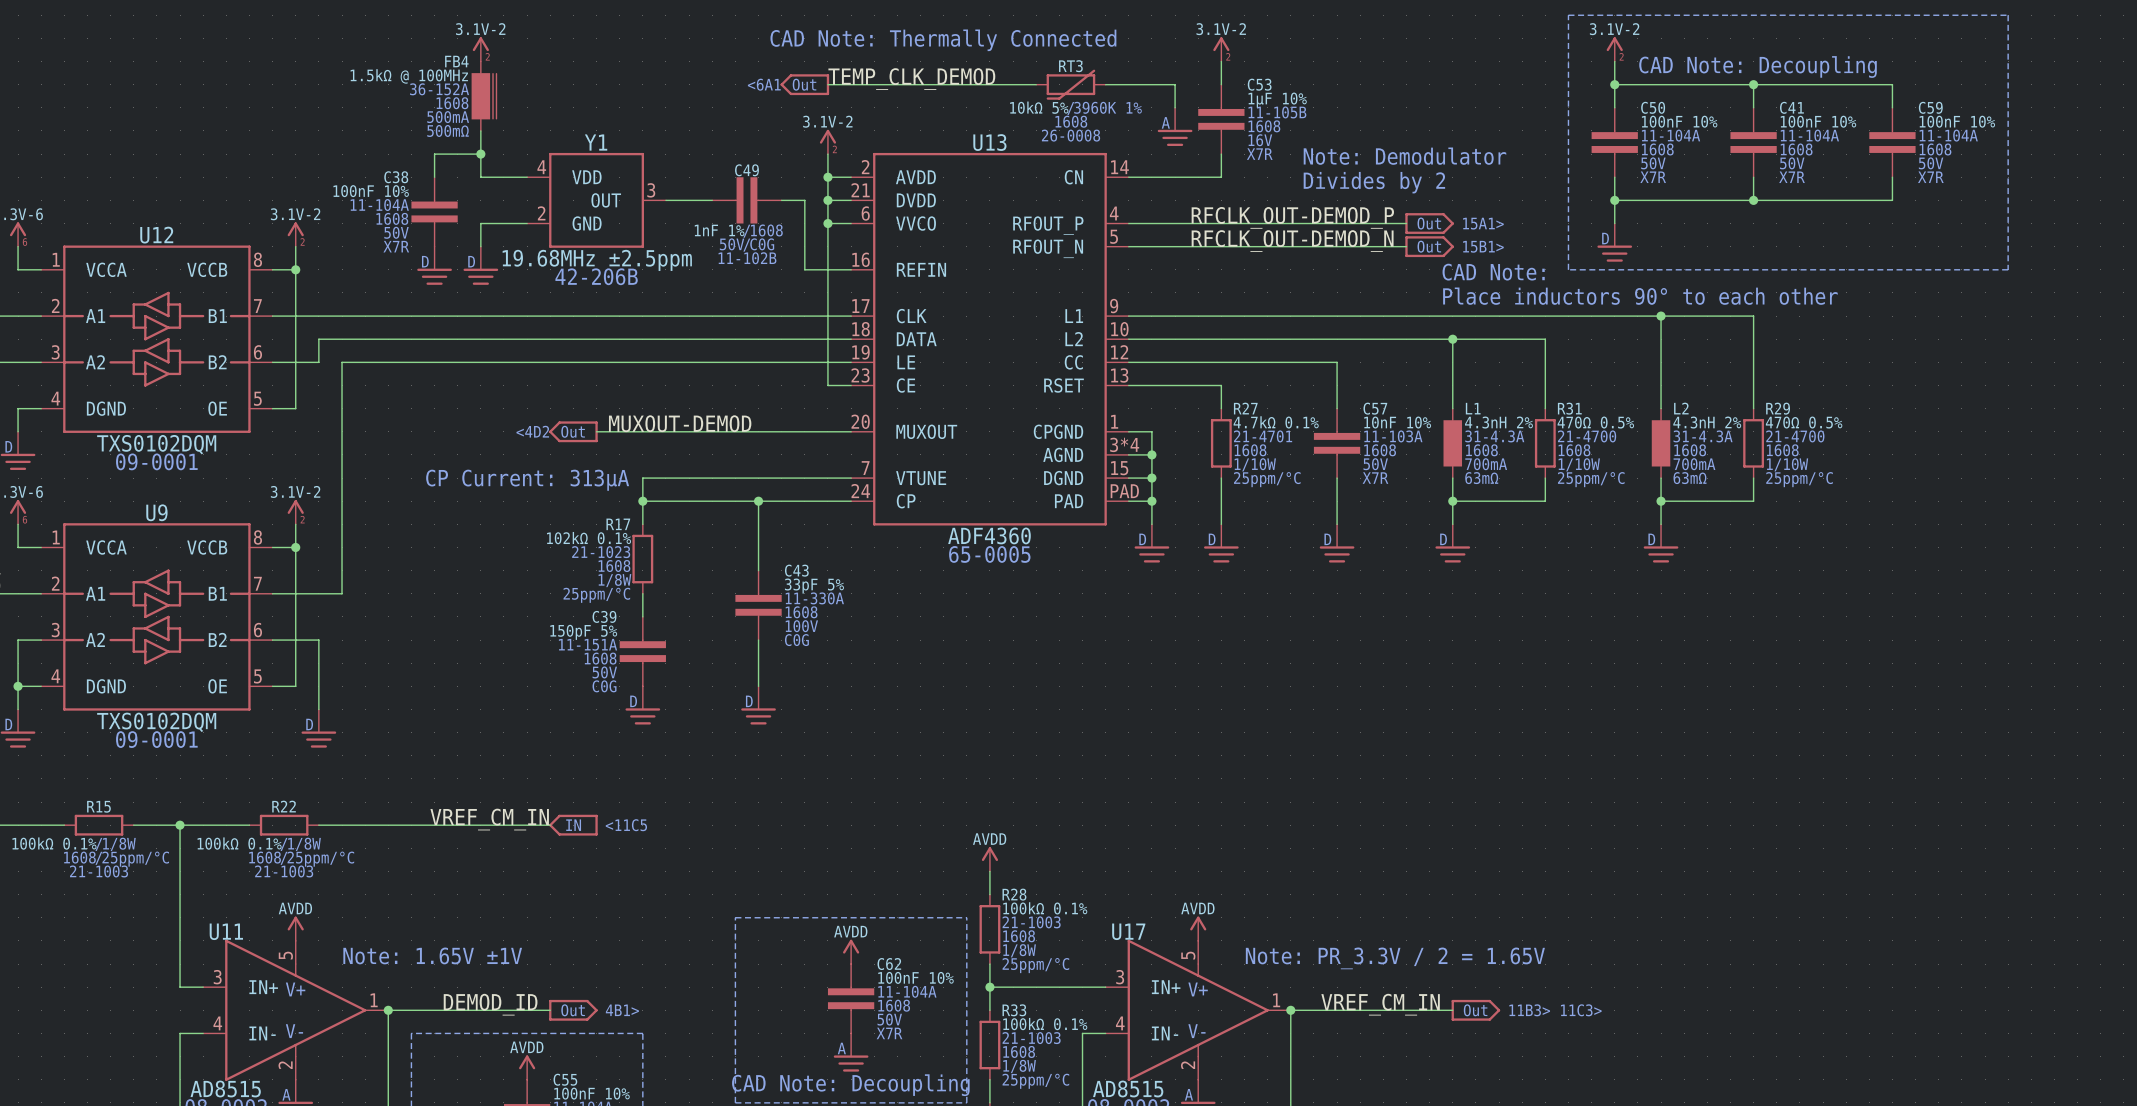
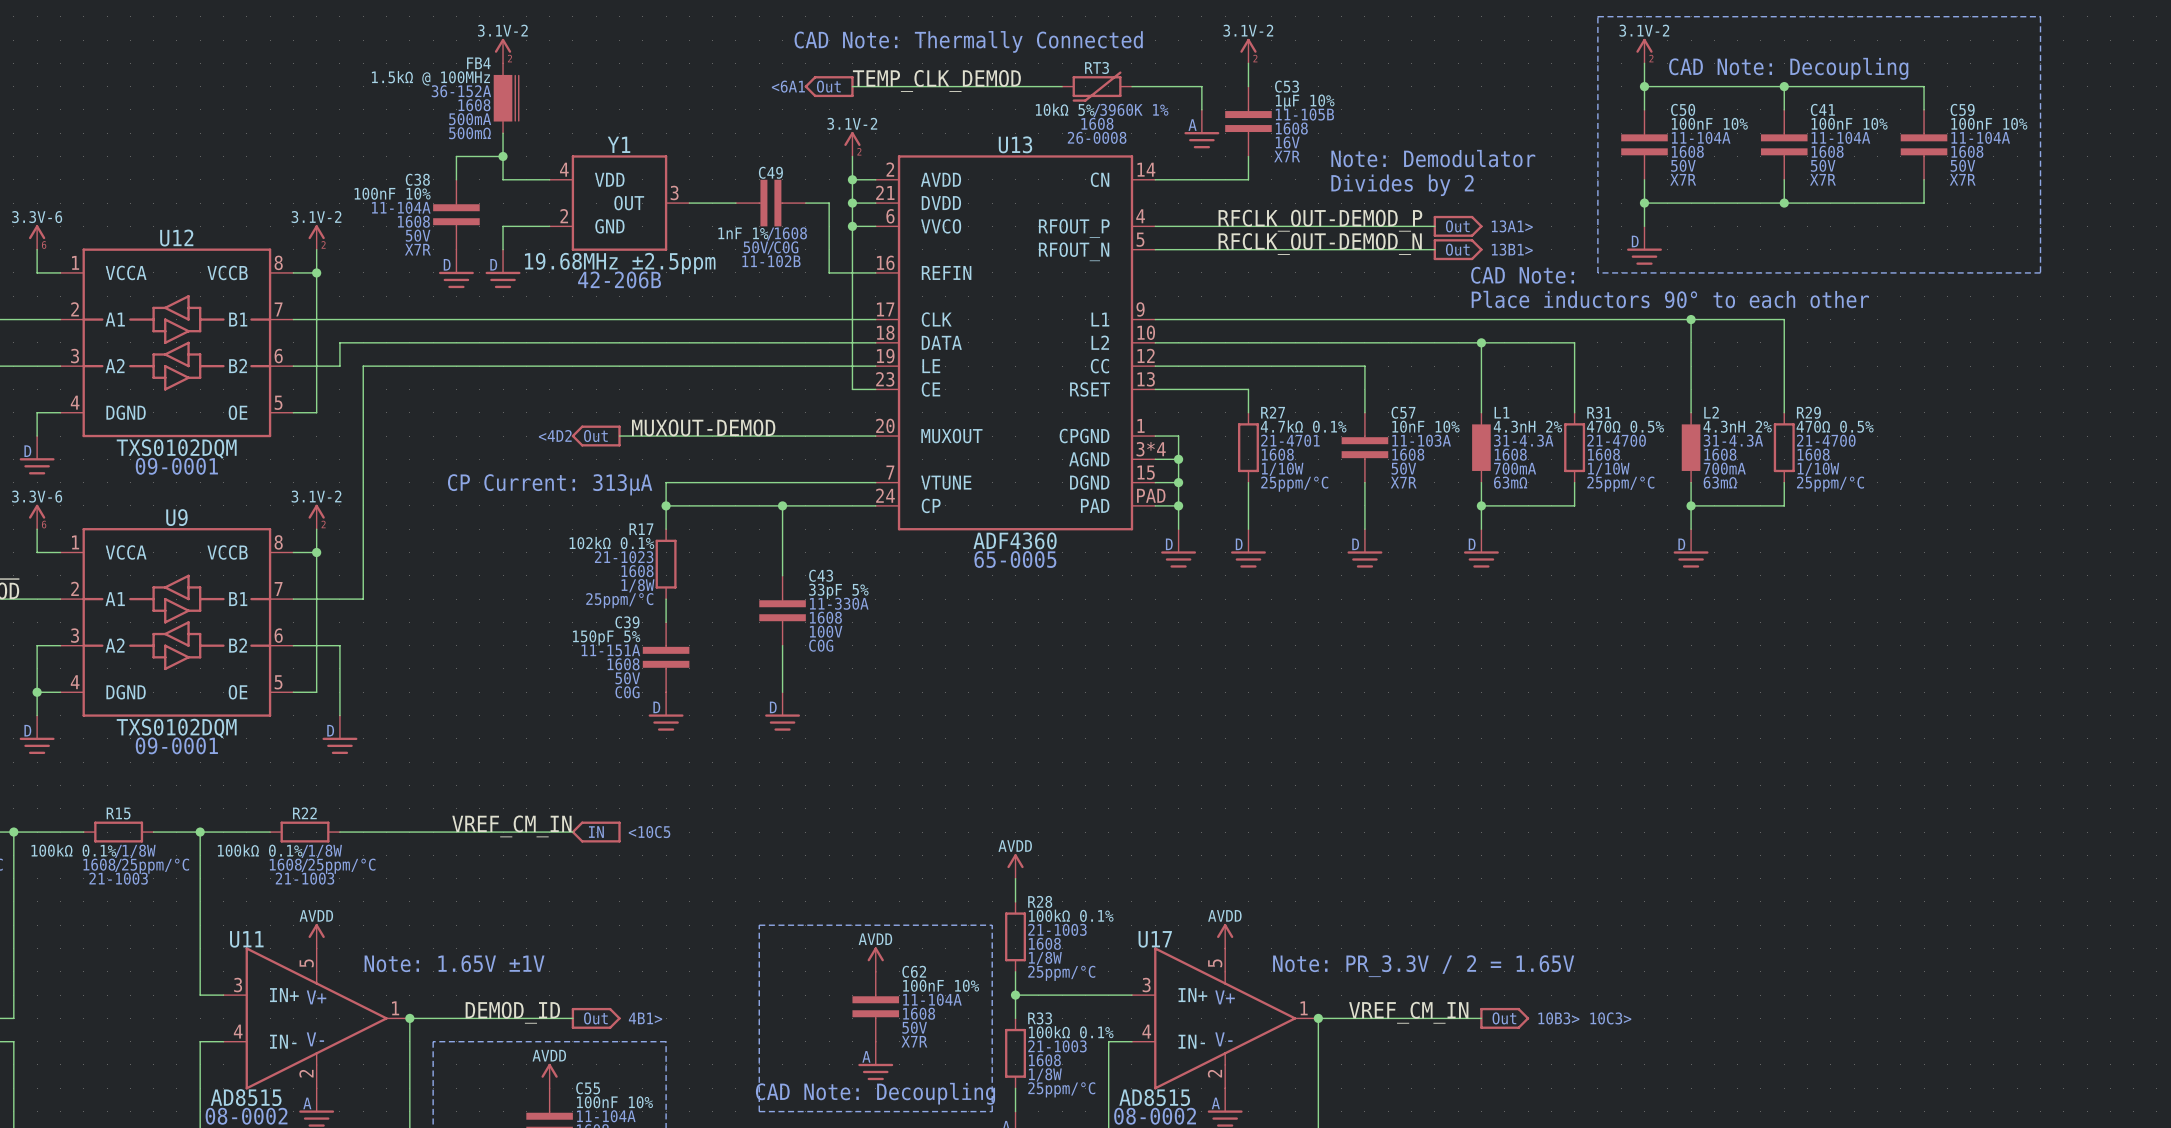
text: 15A1> (1483, 223) -> 13A1> (1512, 226)
text: 15B1> (1483, 246) -> 13B1> (1512, 249)
text: <11C5 (626, 825) -> <10C5 (649, 832)
text: 11B3> 11C3> (1555, 1010) -> 10B3> 10C3> (1584, 1018)

